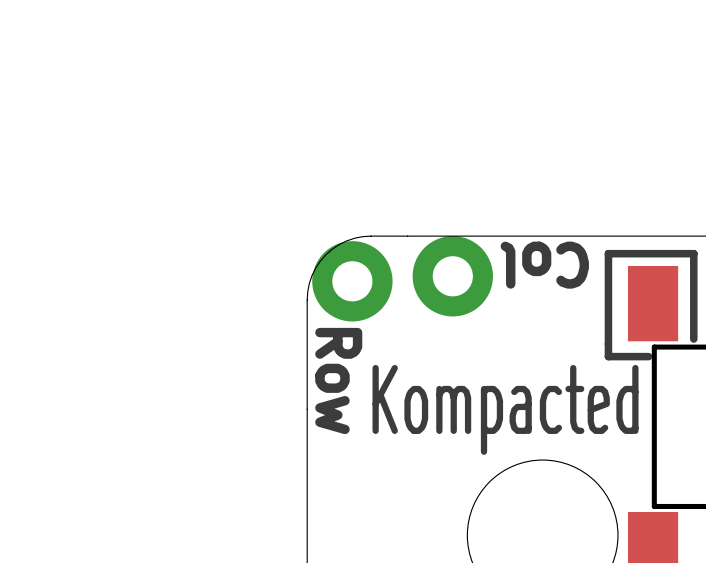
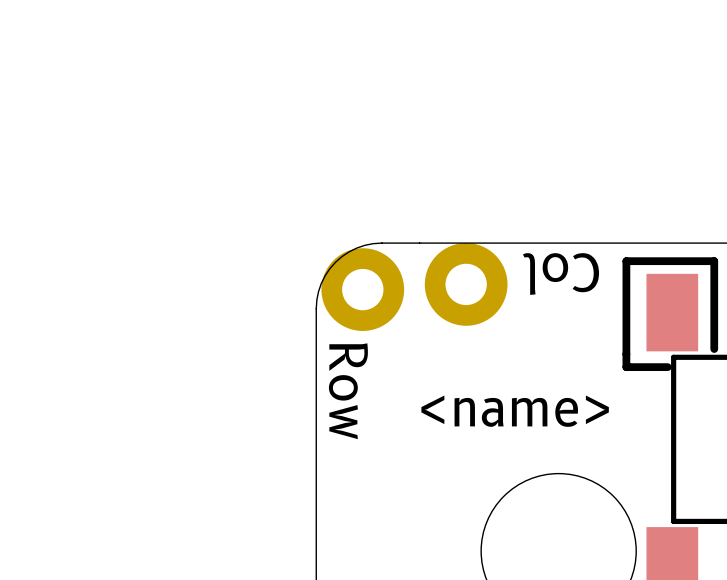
text: Kompacted (505, 409) -> <name> (515, 411)

